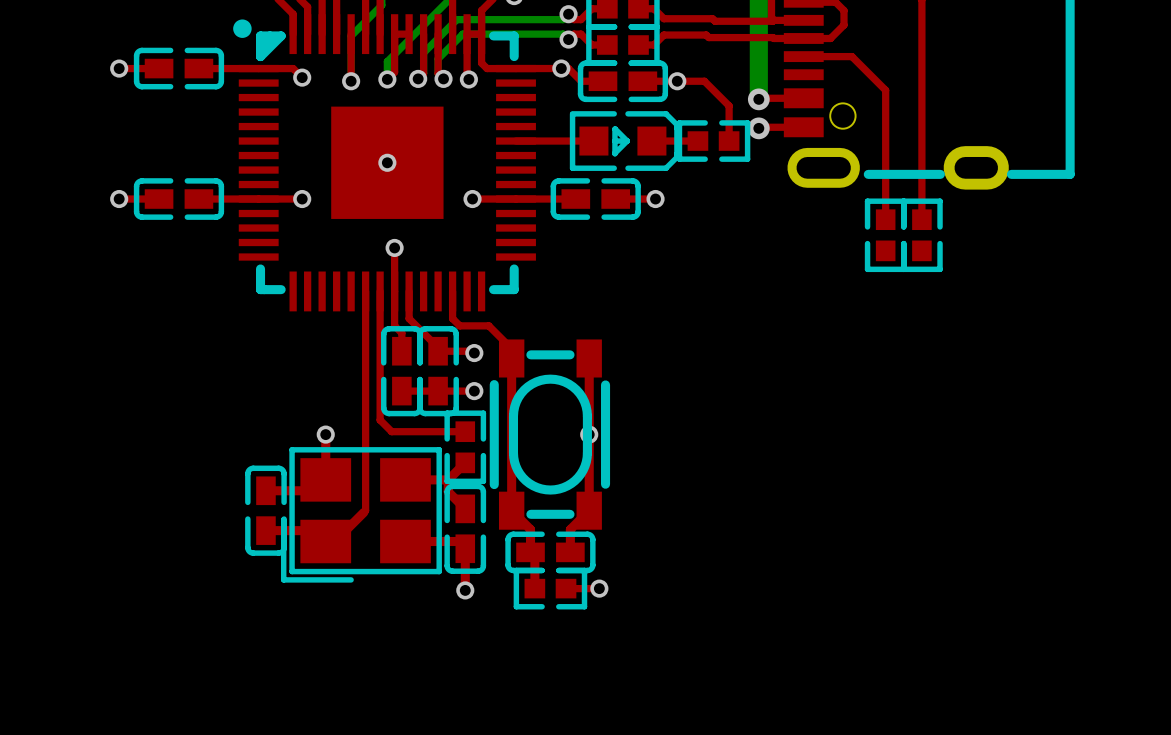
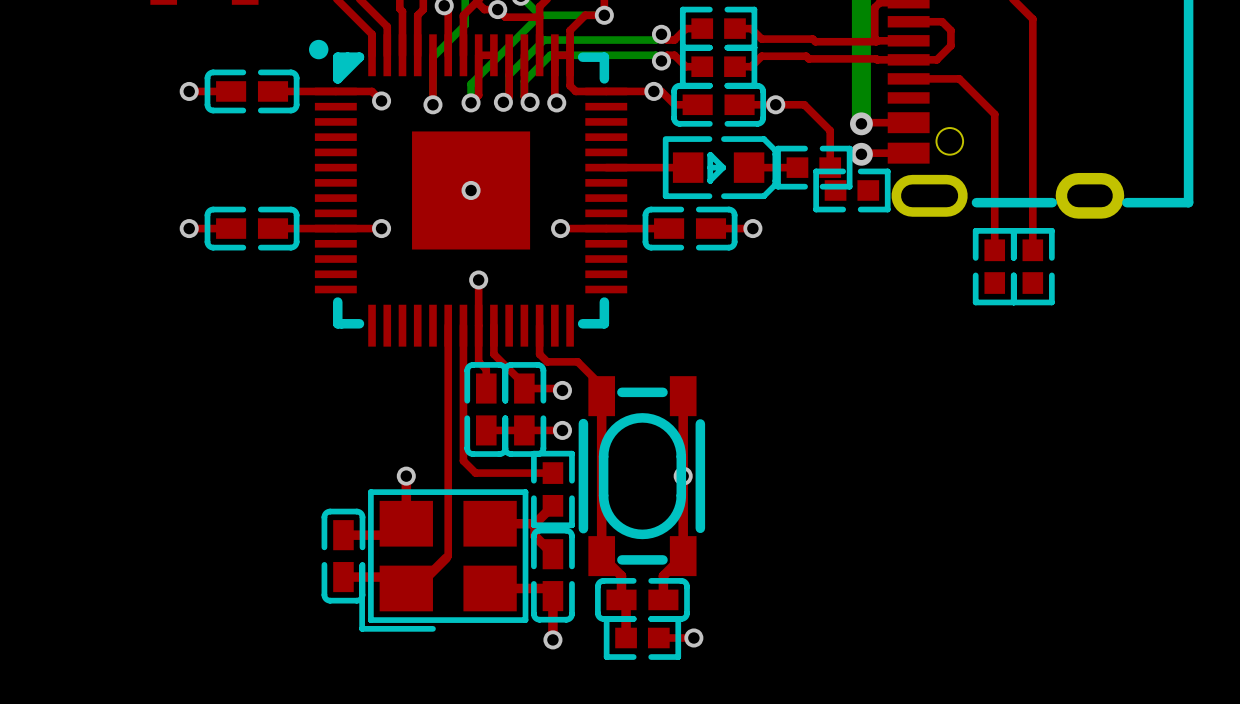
part: none -> (851, 190)

